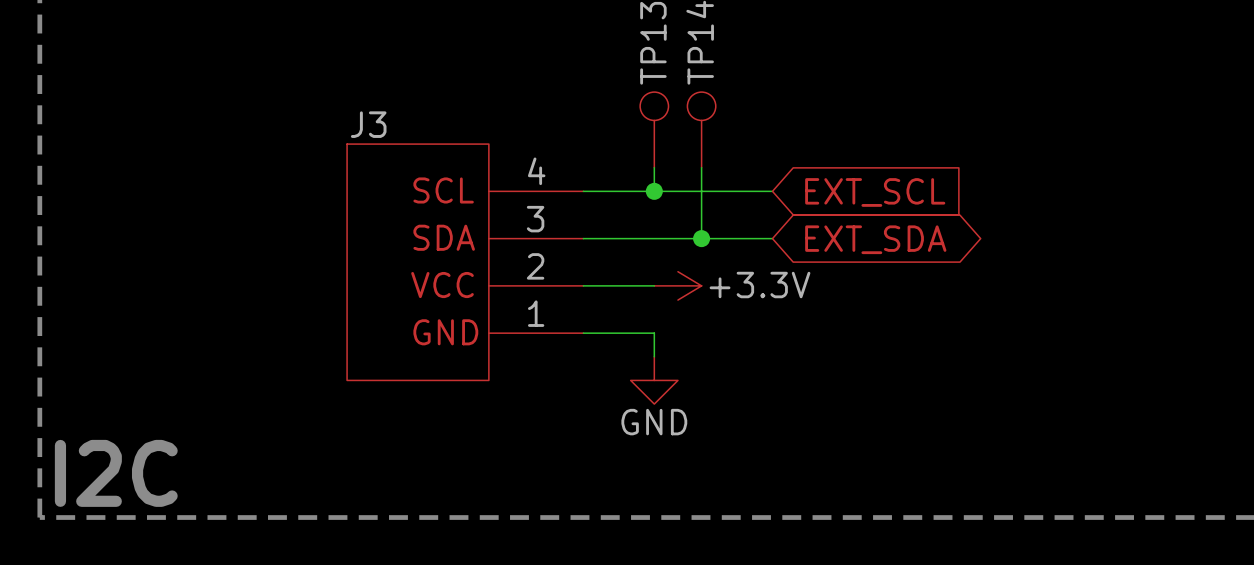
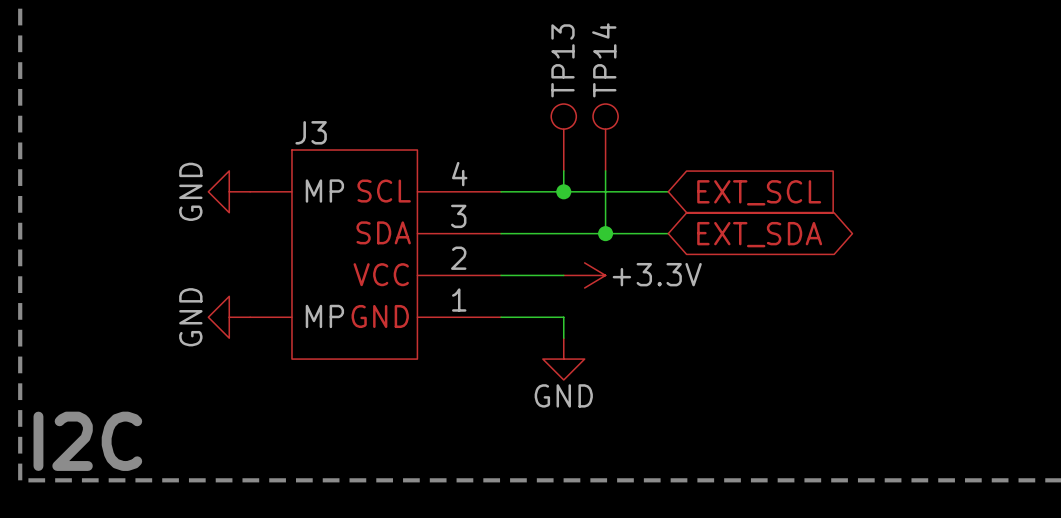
J3 symbol: [347, 144, 584, 381] -> [250, 150, 502, 360]
power symbol: none -> GND (229, 191)
power symbol: none -> GND (229, 317)

